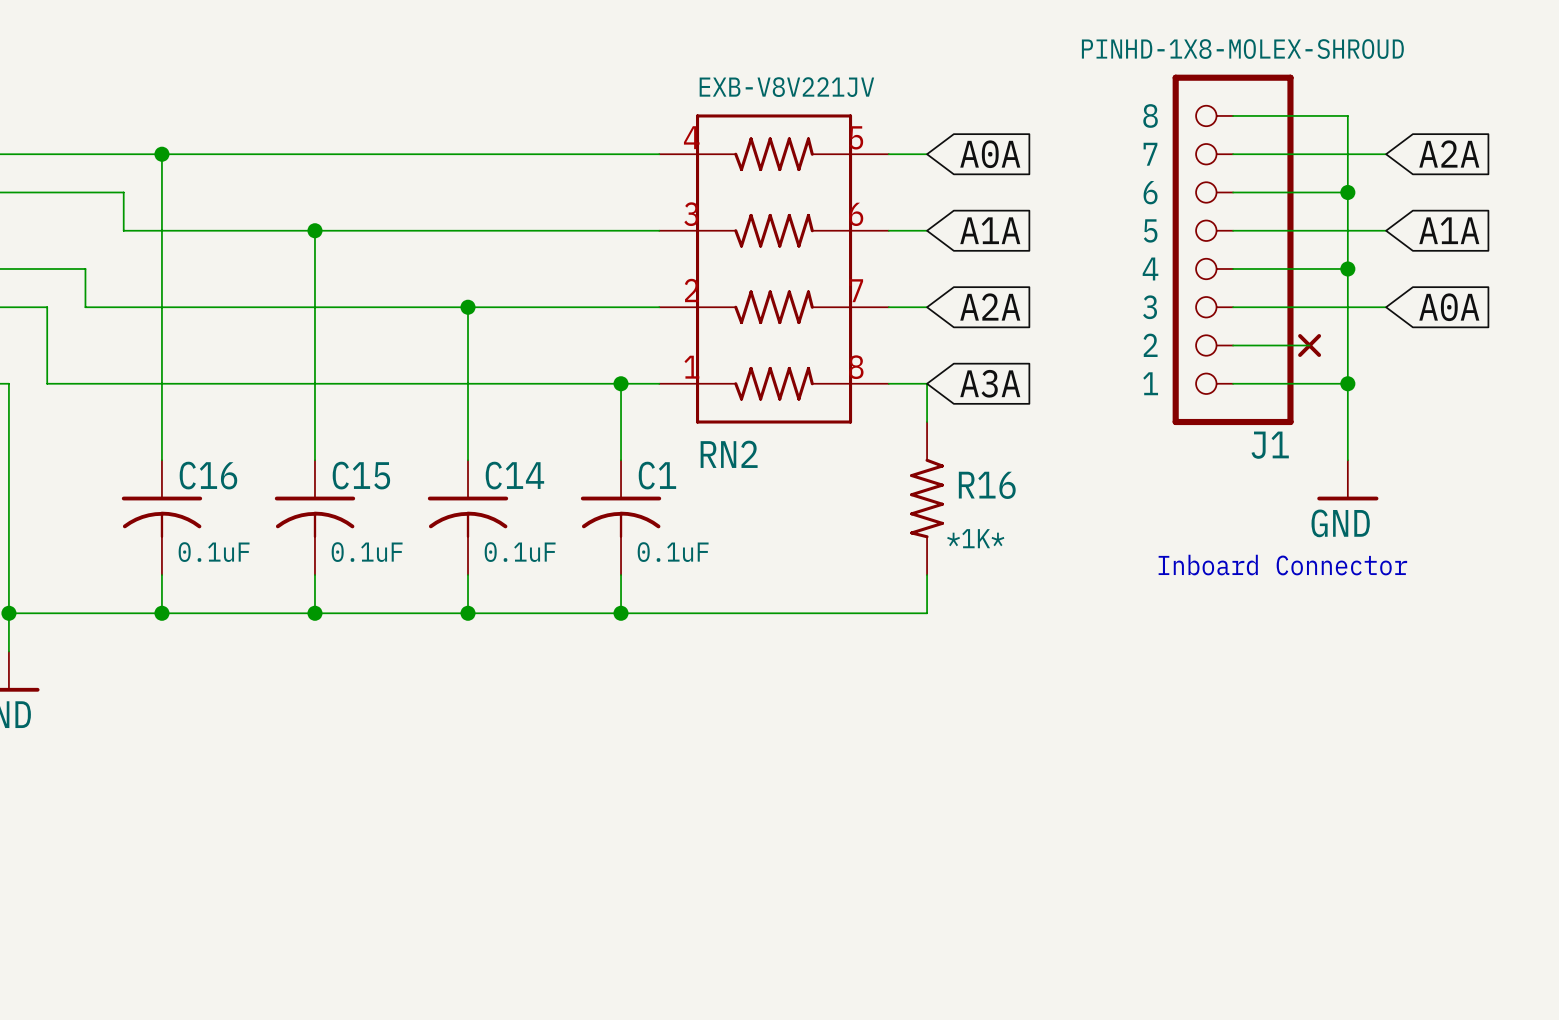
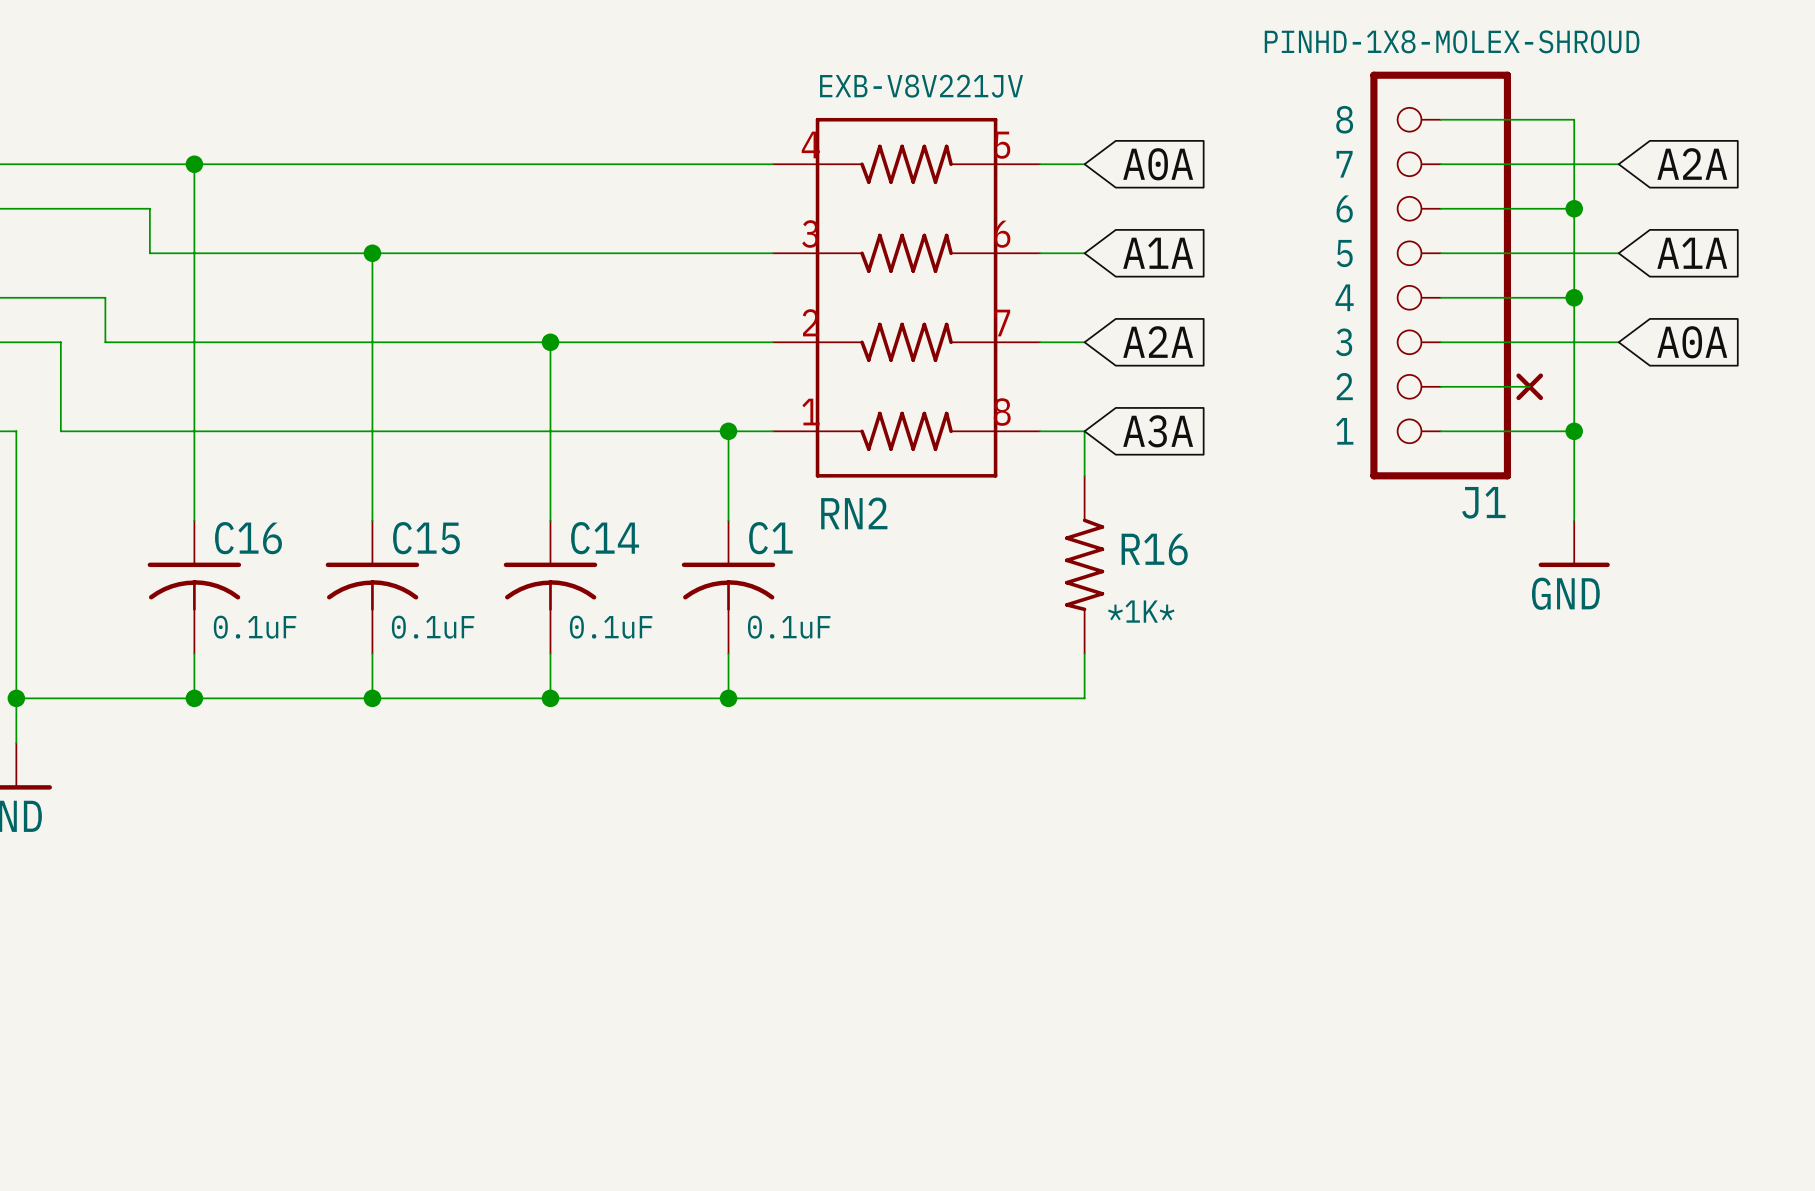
text: Inboard Connector (1282, 565) -> none

